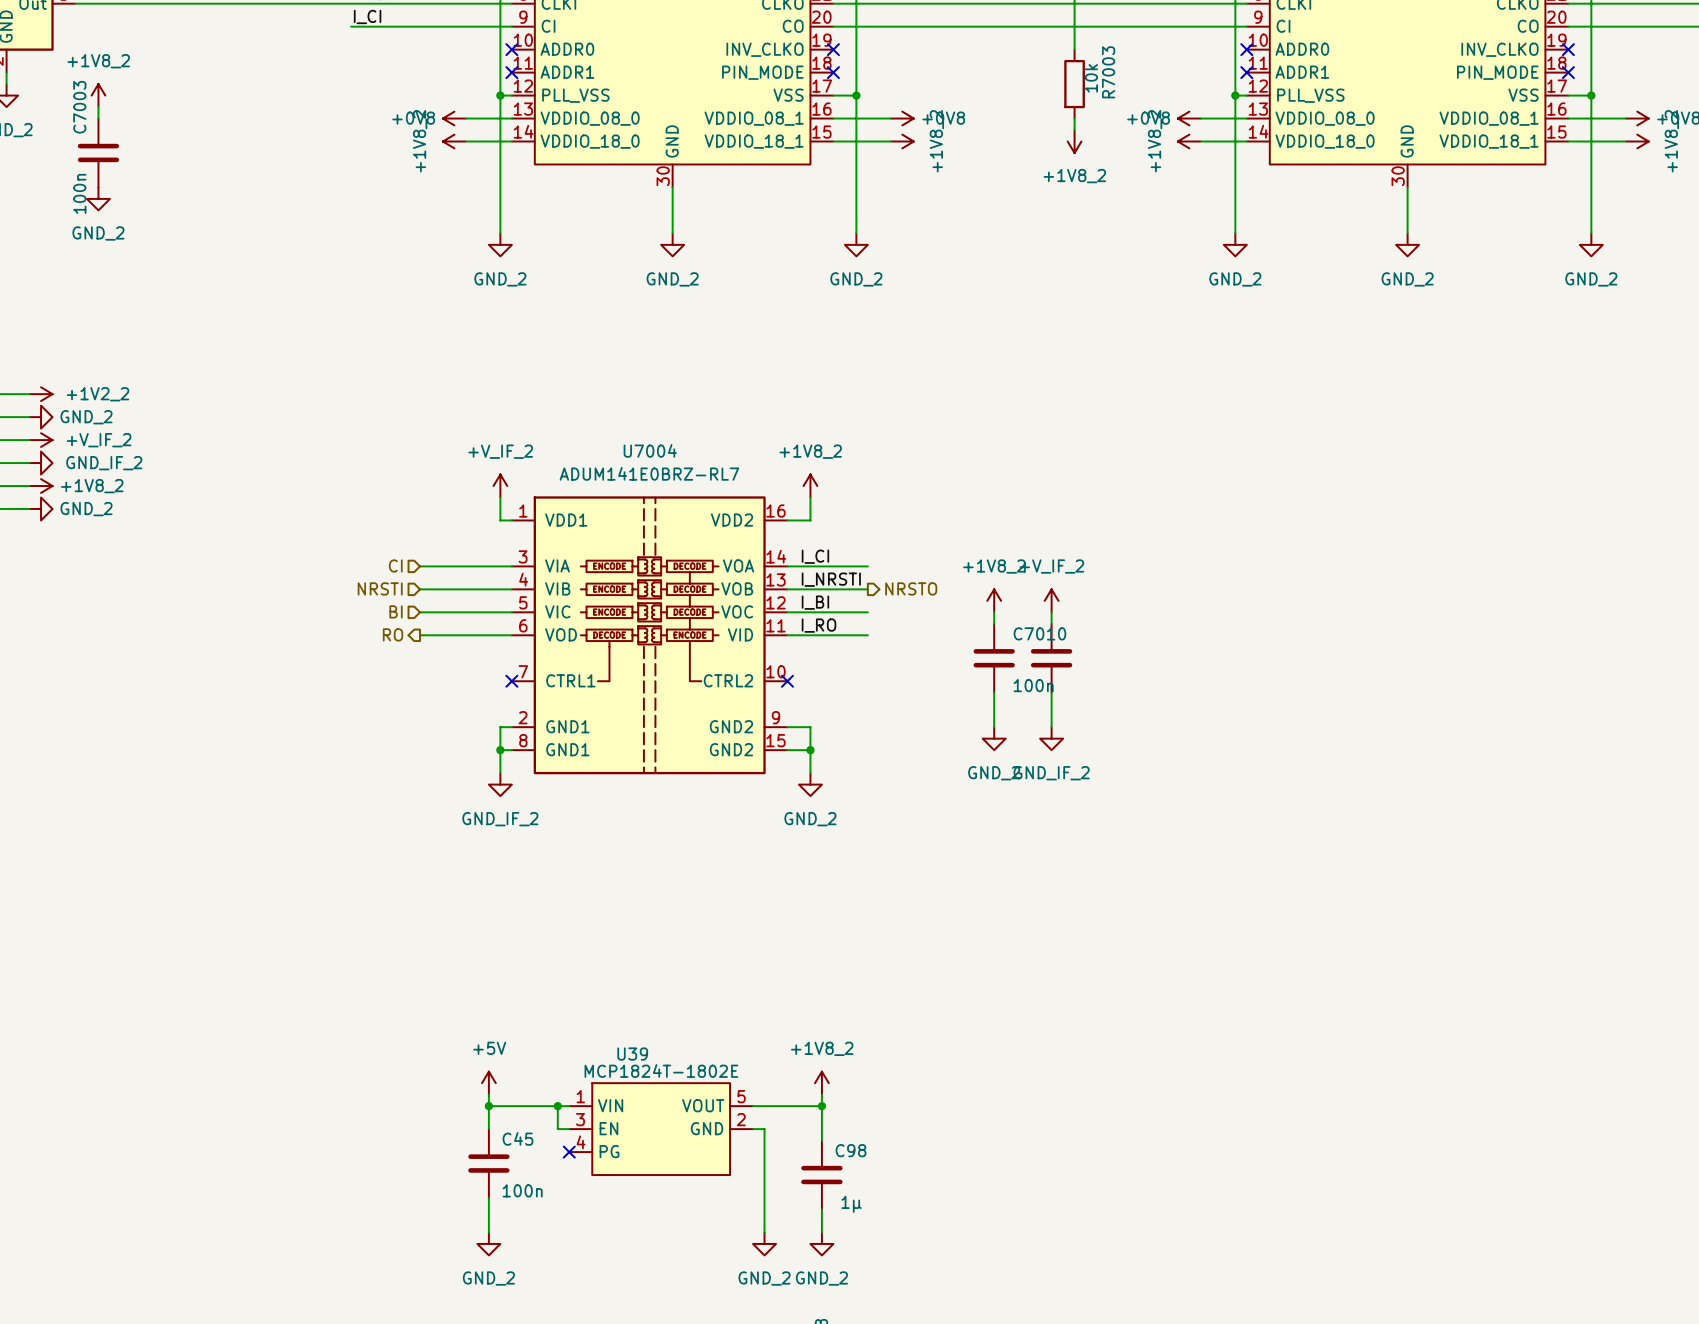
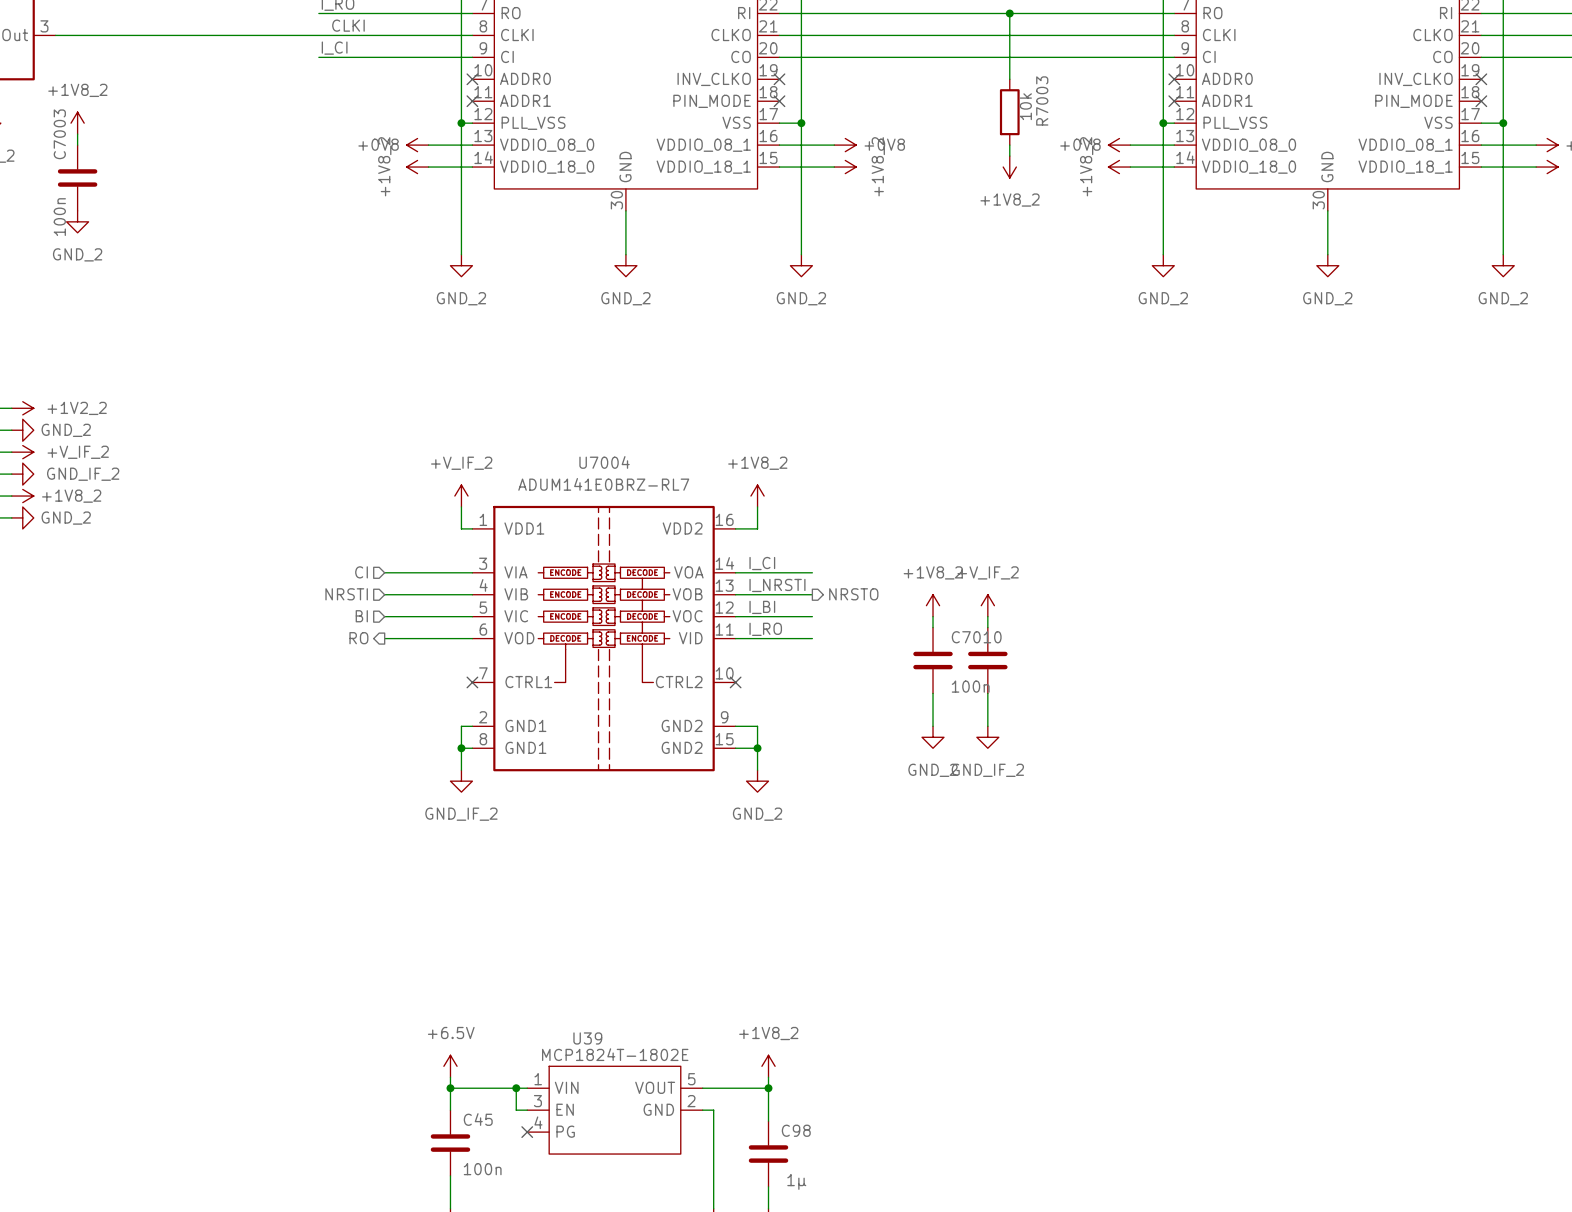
power symbol: +5V (488, 1083) -> +6.5V (450, 1066)

